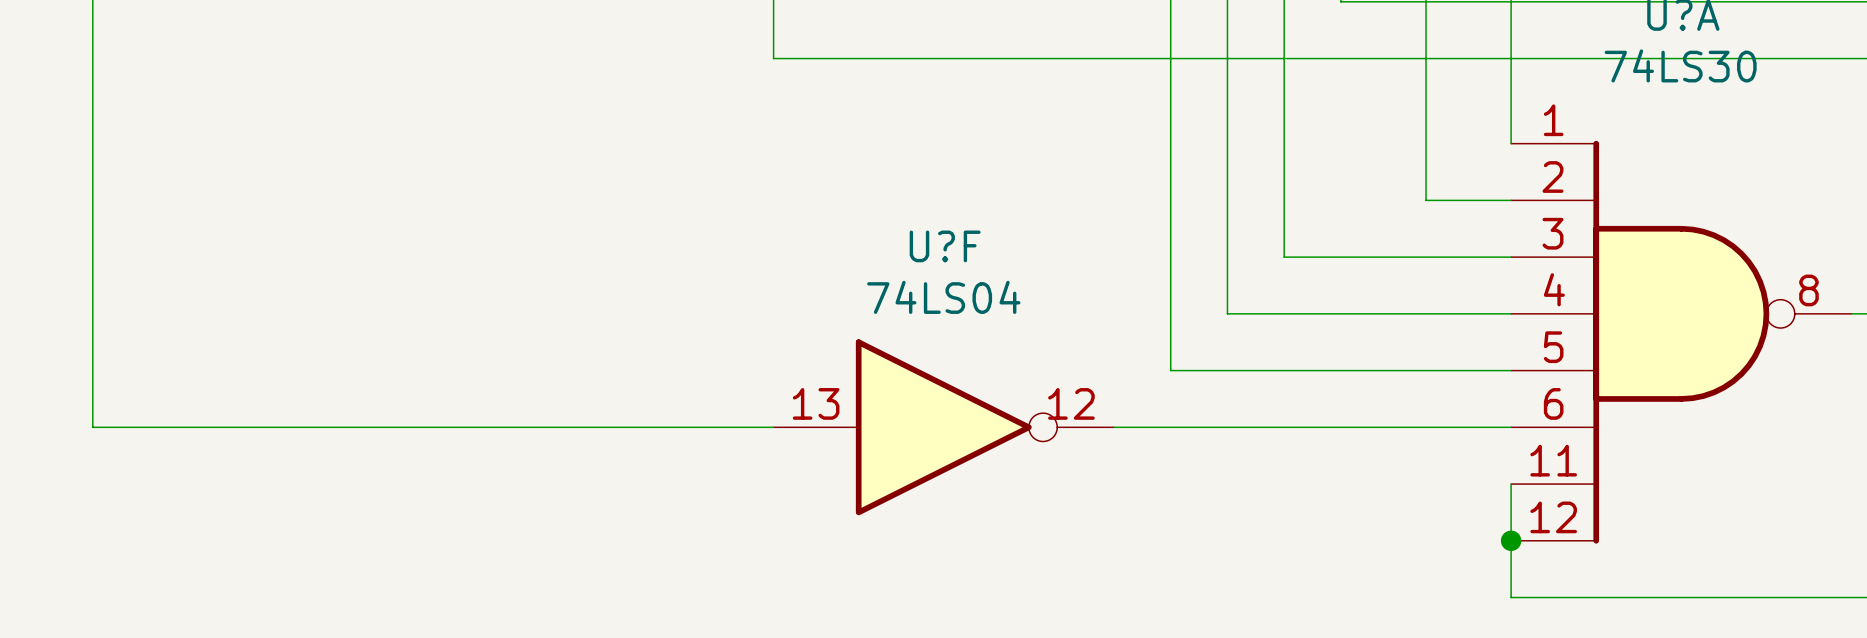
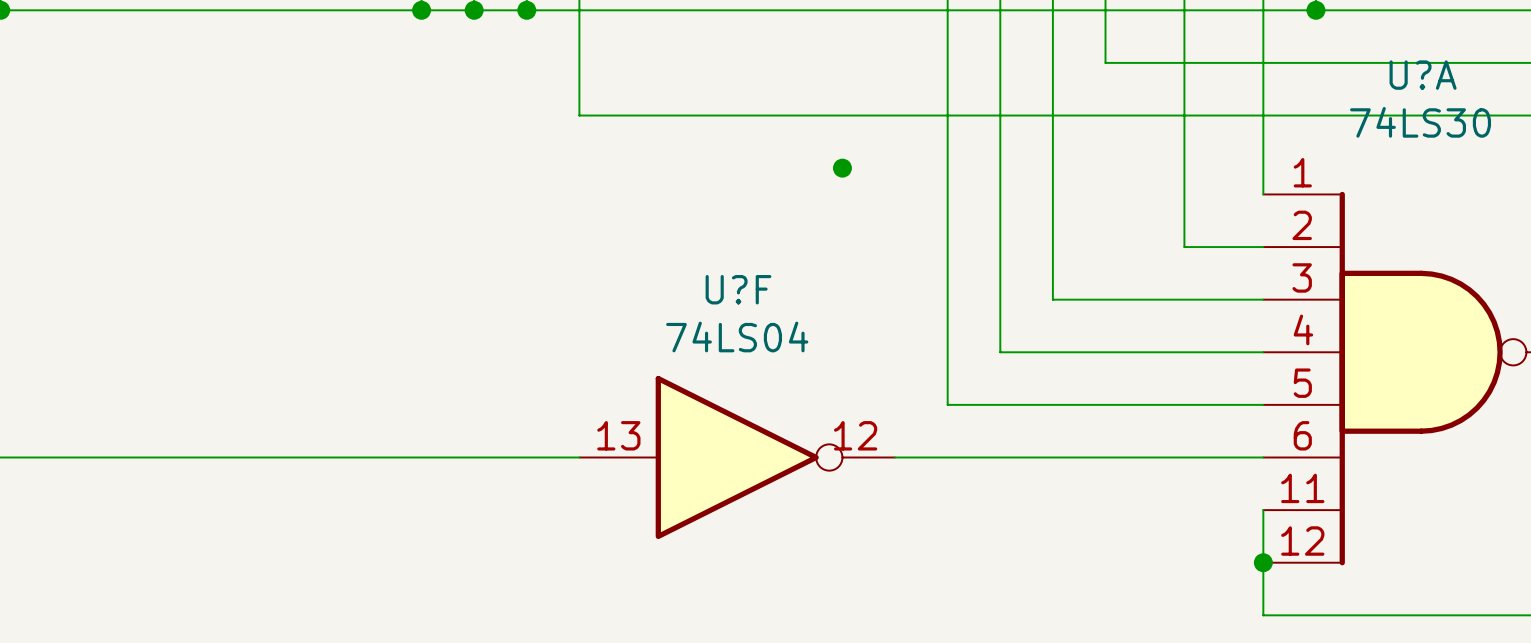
junction: none -> (842, 168)

